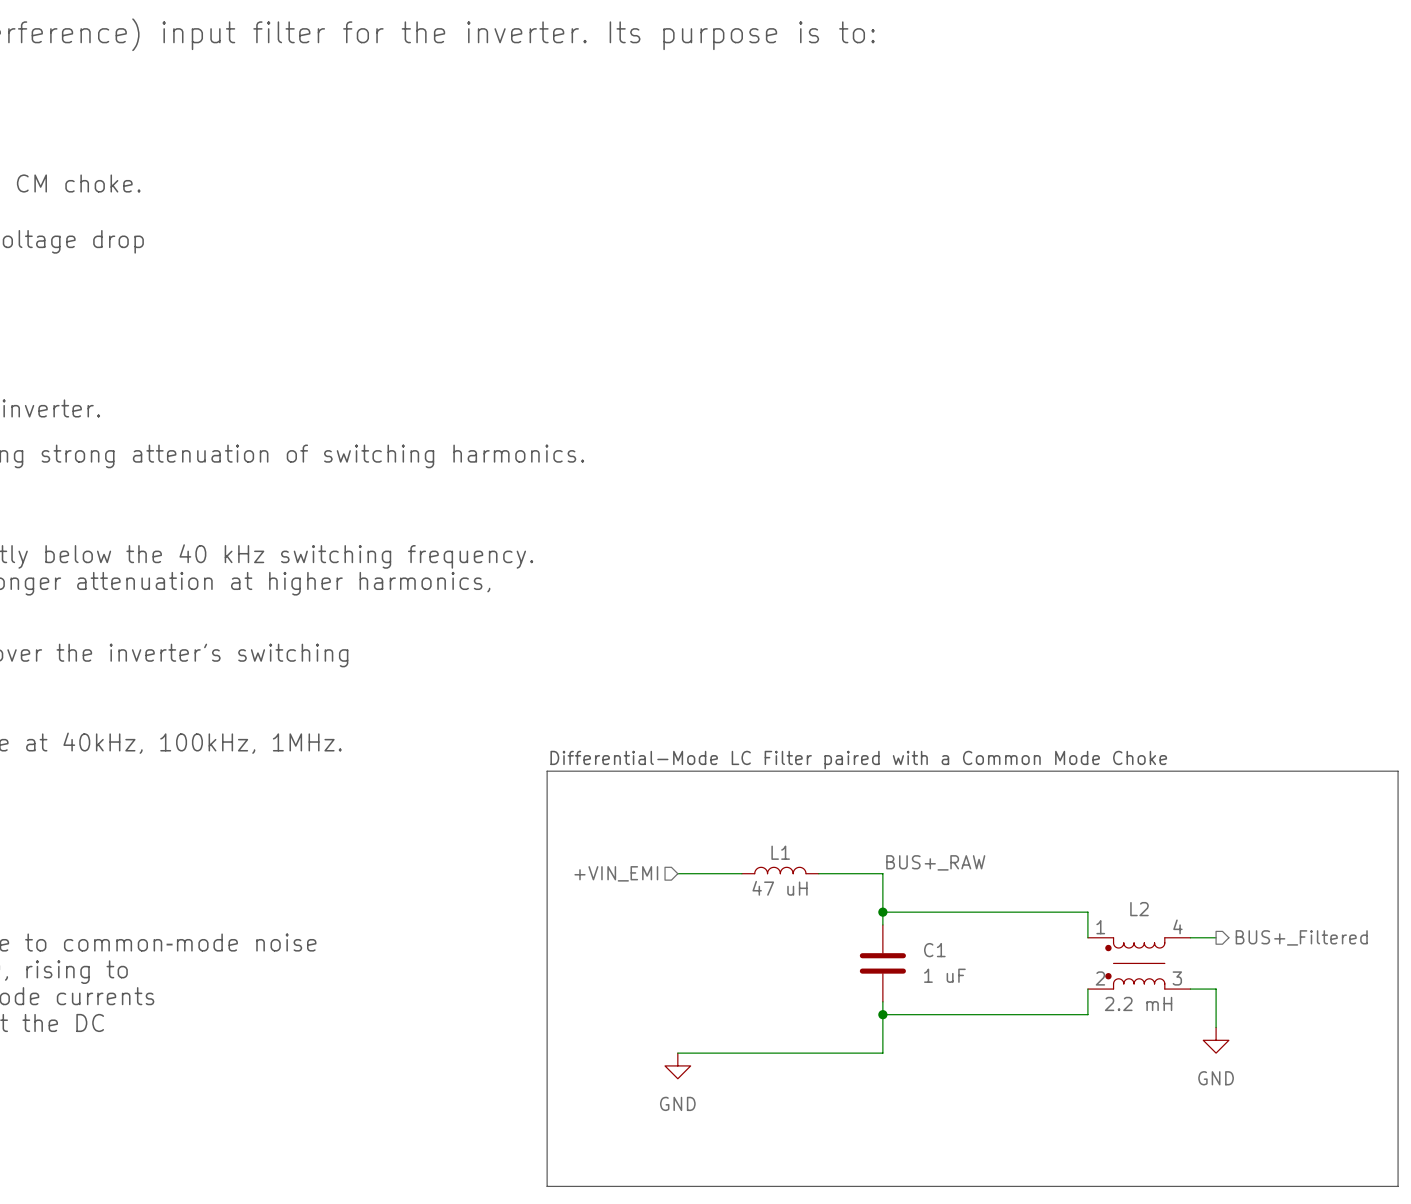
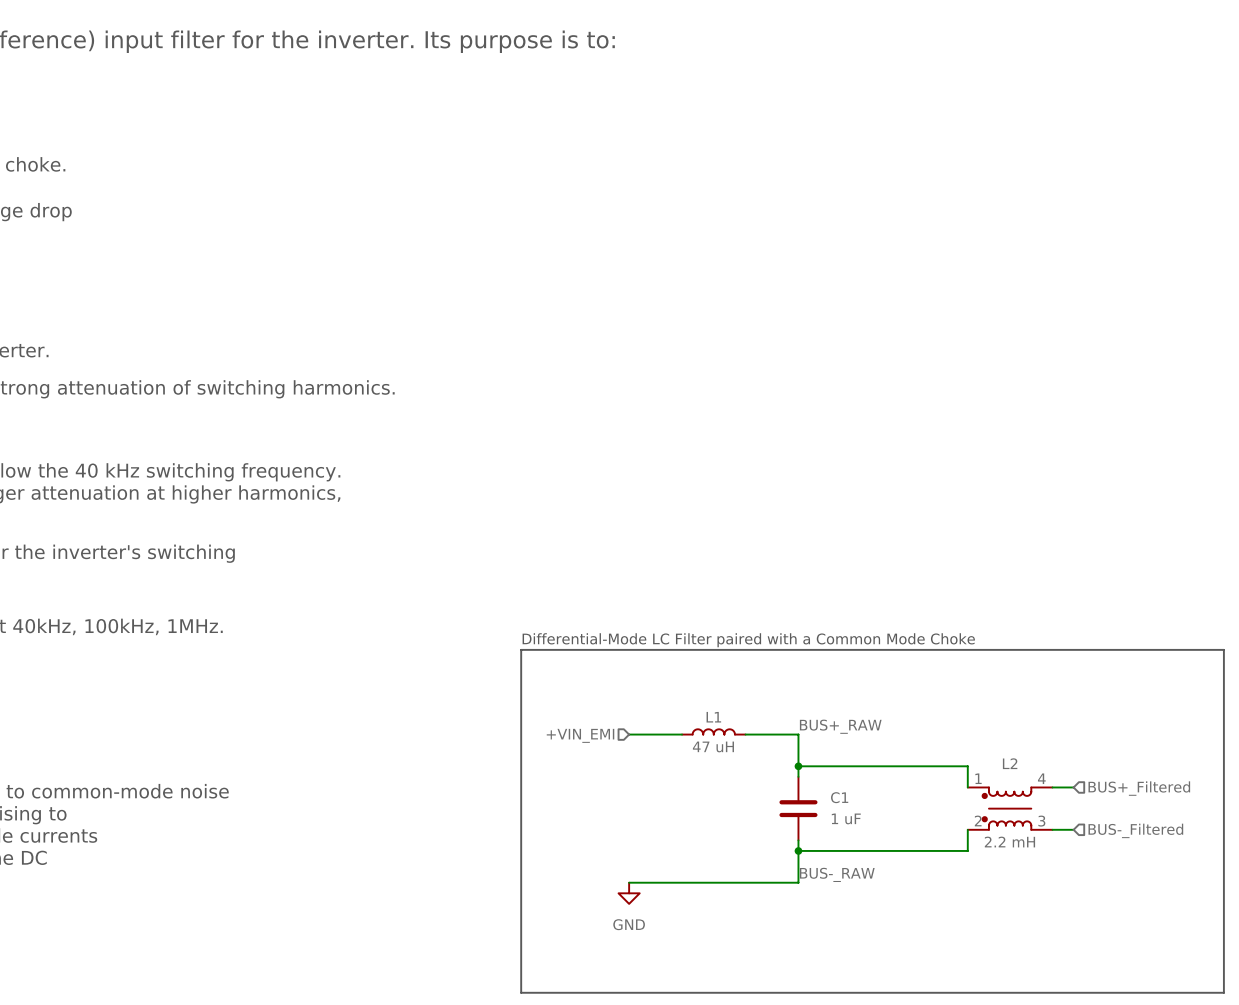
hierarchical label shape: output (1301, 937) -> input (1139, 788)
wire: (1216, 989) (1216, 1027) -> none
hierarchical label: none -> BUS-_Filtered (1135, 830)
power symbol: GND (1216, 1040) -> none
label: none -> BUS-_RAW (837, 874)

